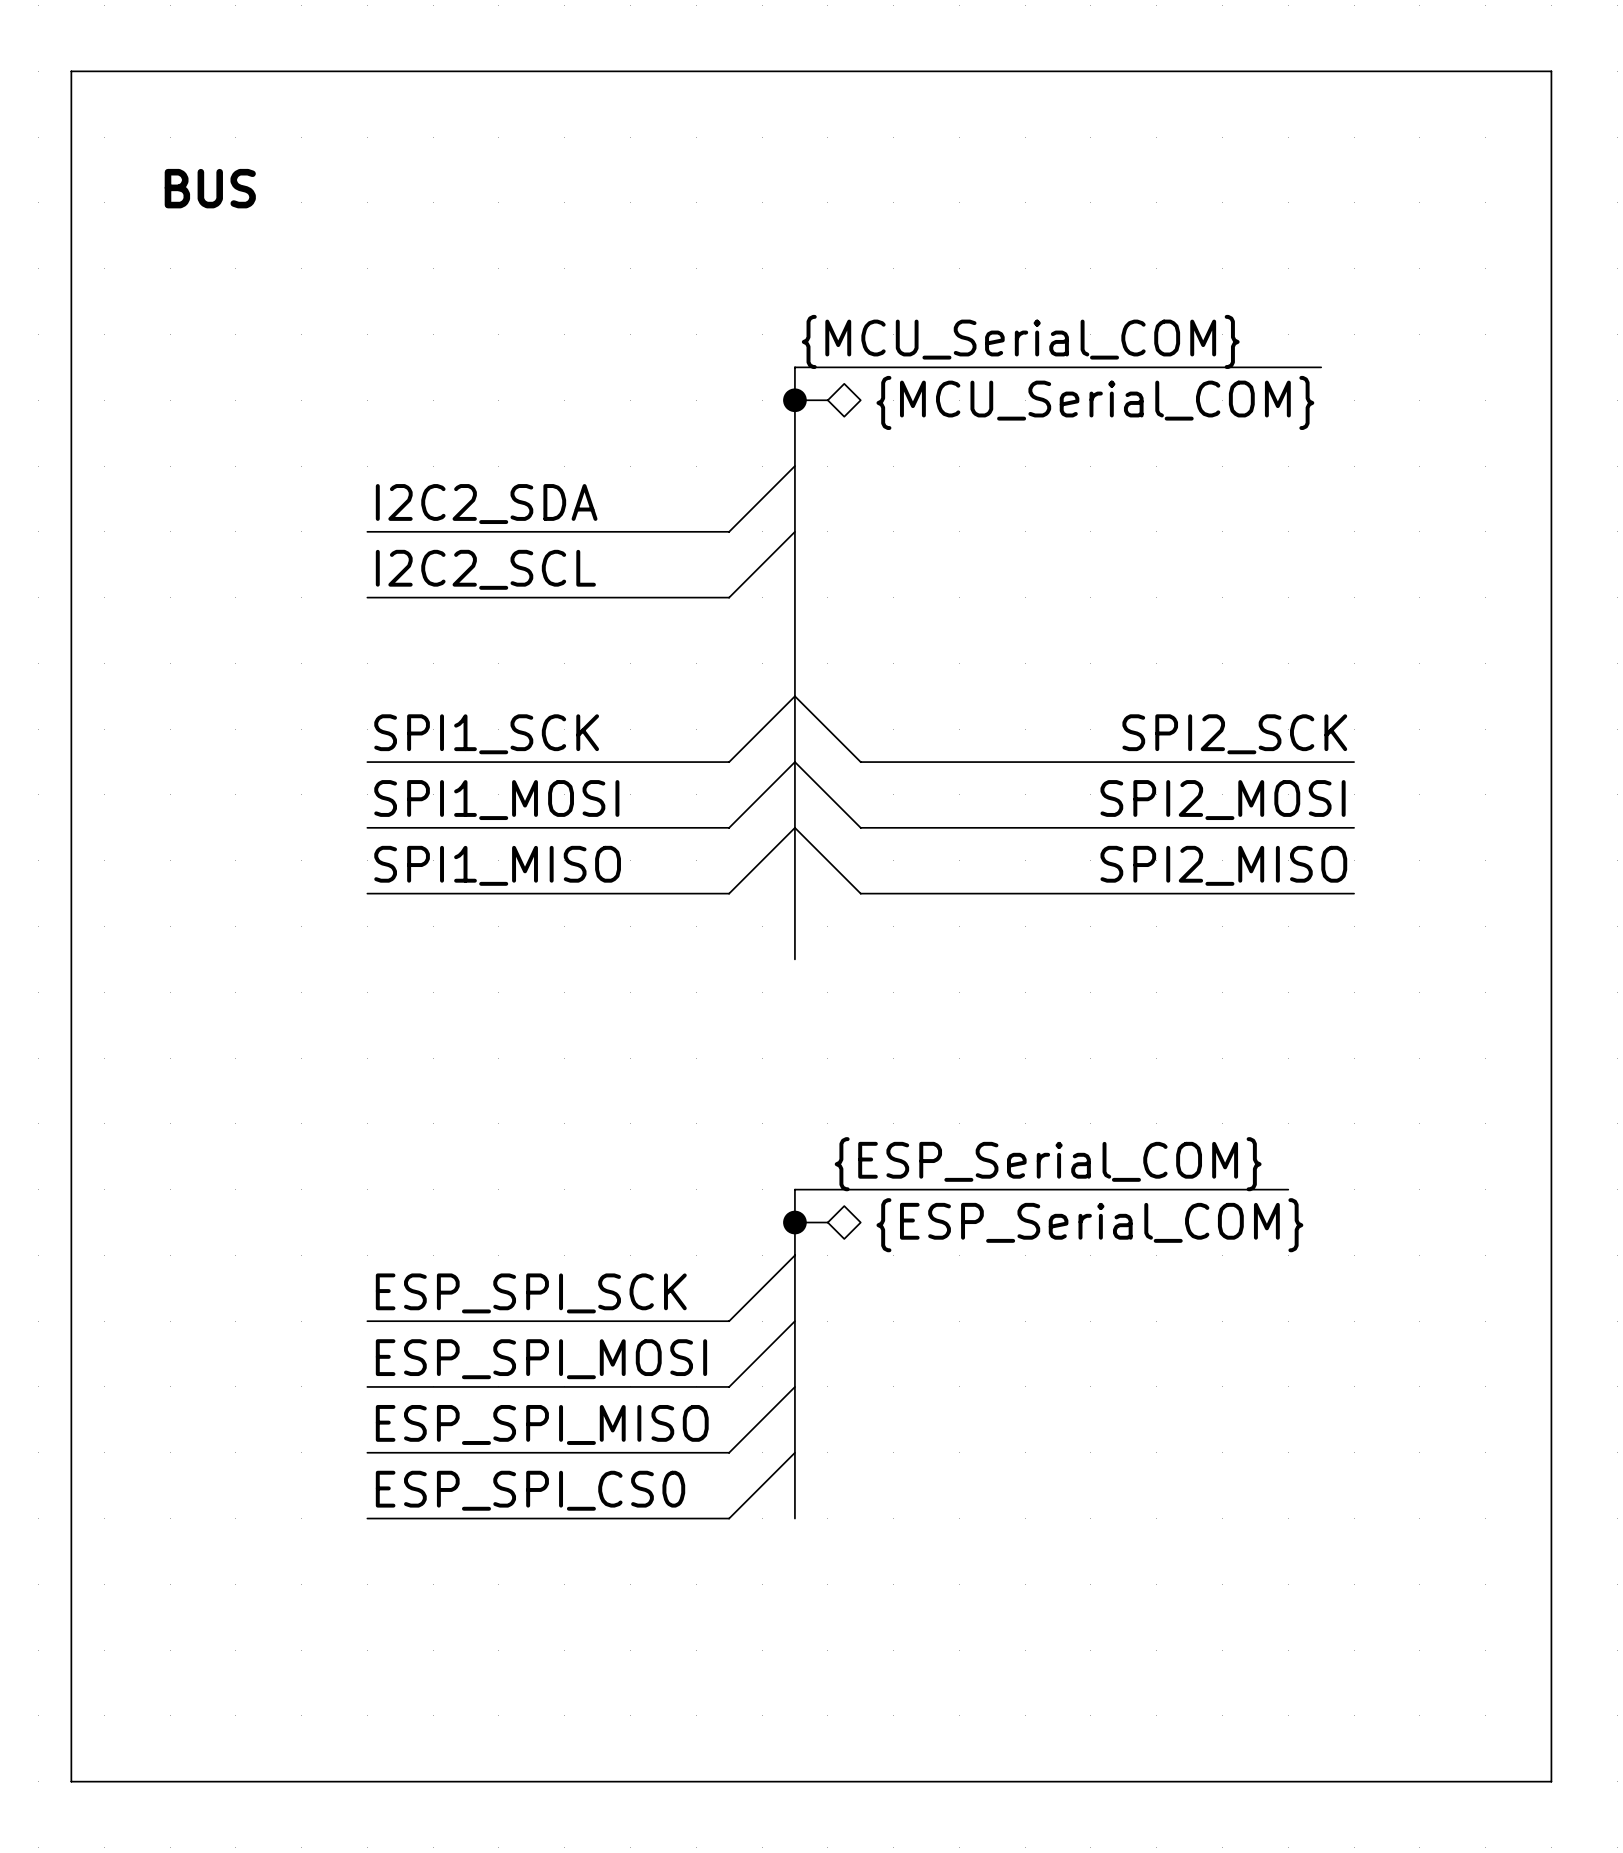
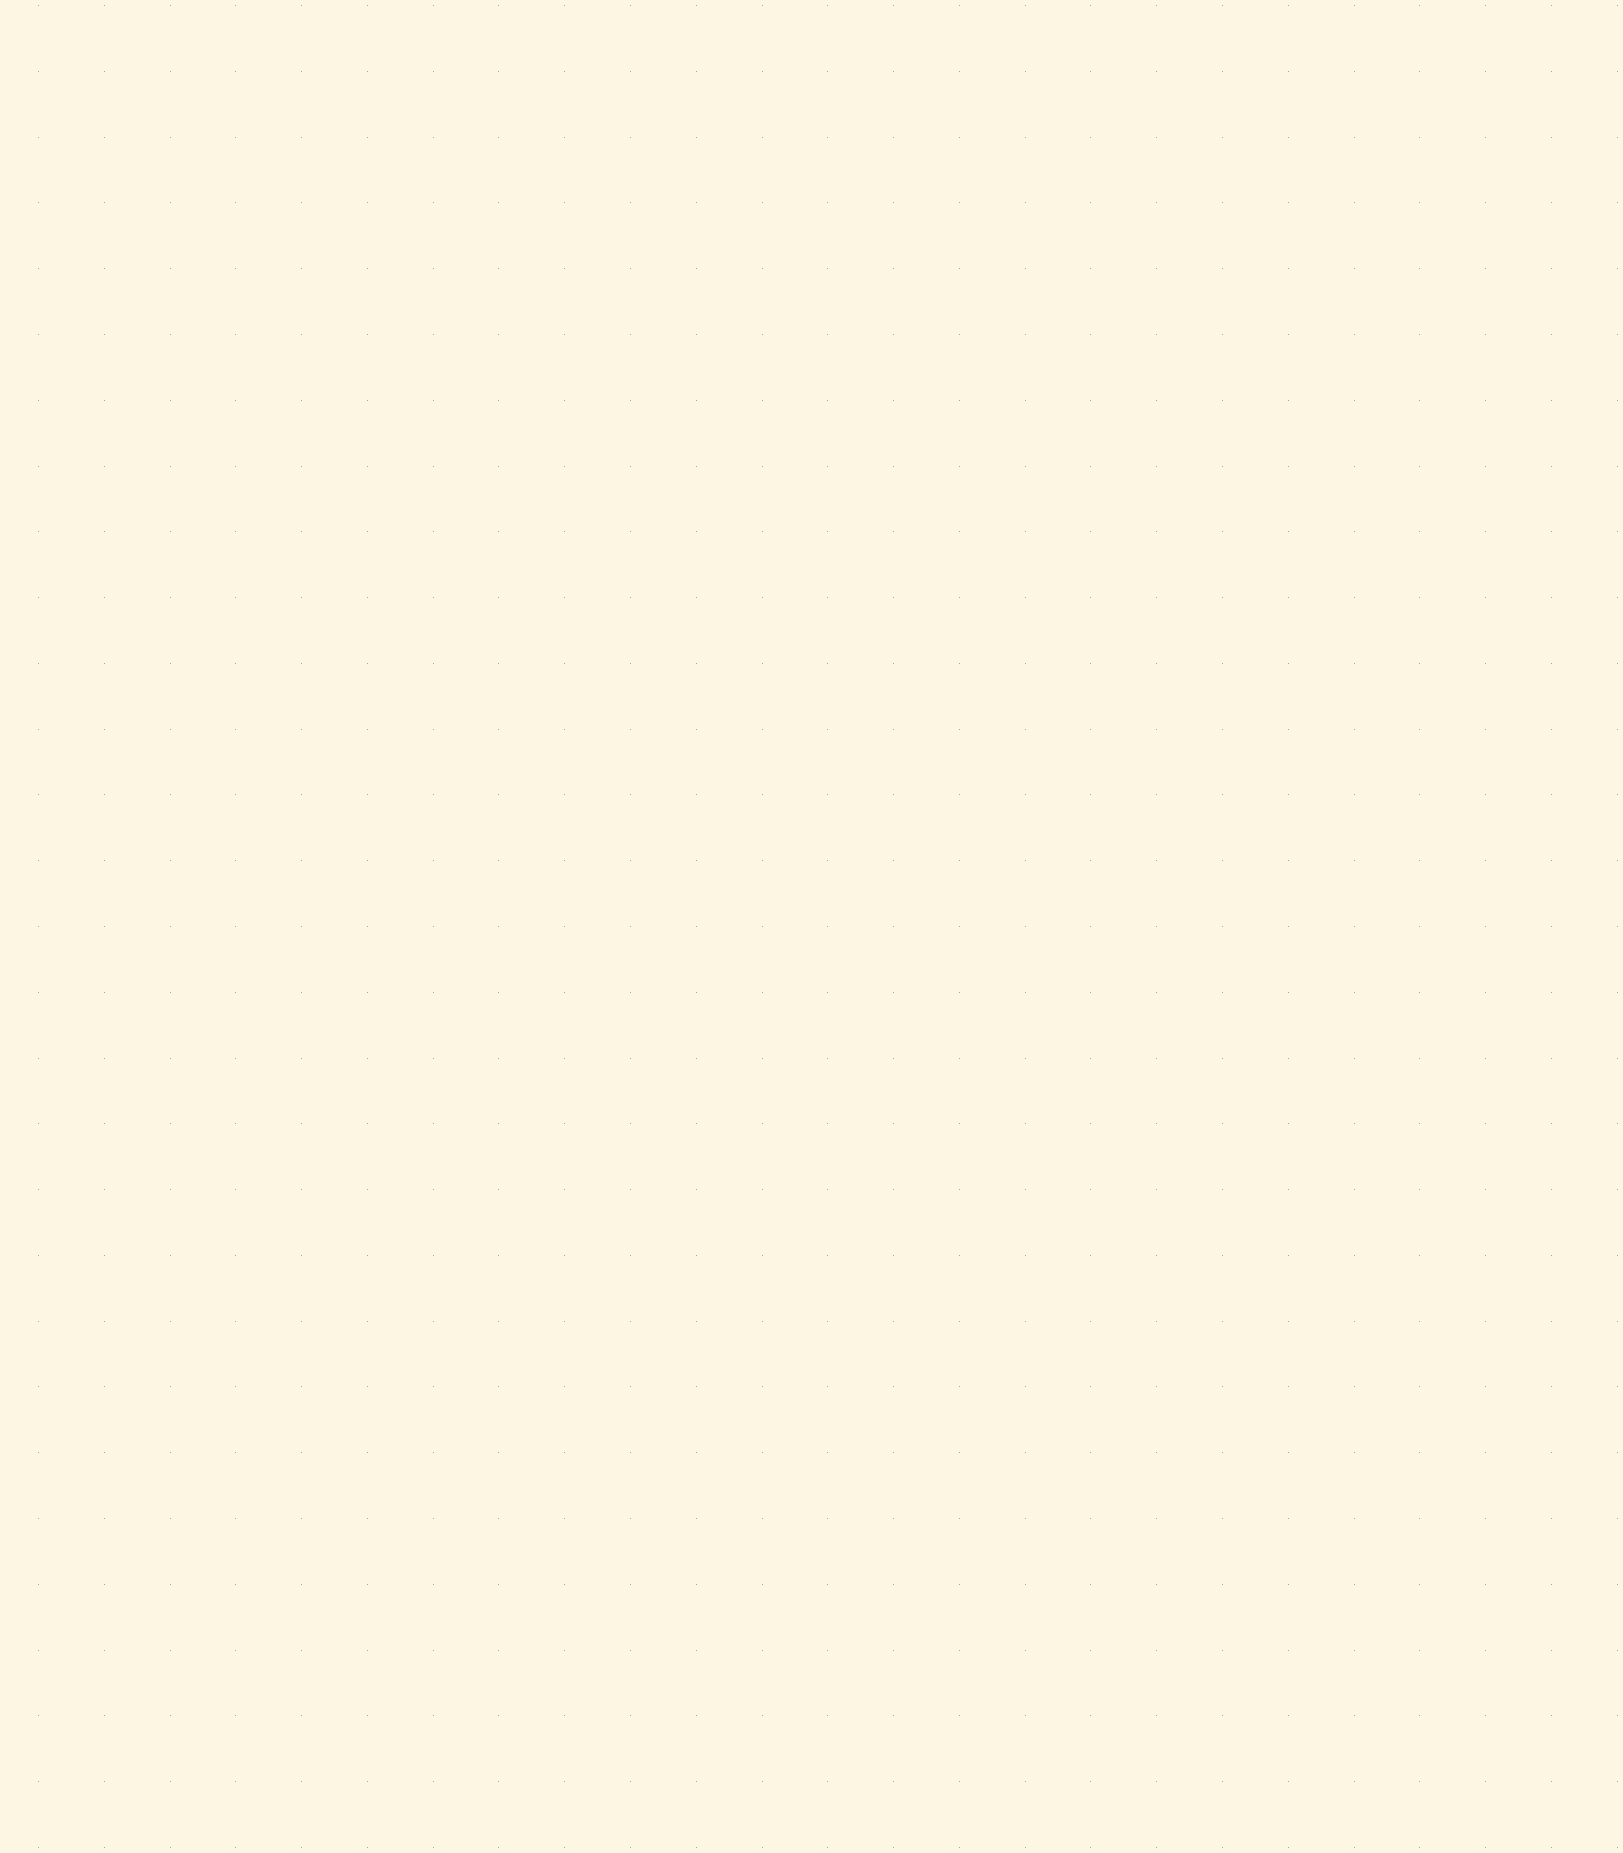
line: (71, 71) (1551, 71) (1551, 1781) (71, 1781) (71, 71) -> none
text: BUS (210, 188) -> none
label: {MCU_Serial_COM} (1020, 341) -> none
bus: (1321, 367) (794, 367) (794, 959) -> none
bus: (794, 400) (827, 400) -> none
junction: (794, 400) -> none
hierarchical label: {MCU_Serial_COM} (1095, 402) -> none
wire: (794, 466) (729, 531) (367, 531) -> none
label: I2C2_SDA (486, 504) -> none
wire: (794, 531) (729, 597) (367, 597) -> none
label: I2C2_SCL (485, 569) -> none
label: SPI1_SCK (486, 734) -> none
label: SPI2_SCK (1234, 734) -> none
wire: (367, 762) (729, 762) (794, 696) (860, 762) (1354, 762) -> none
label: SPI1_MOSI (496, 800) -> none
label: SPI2_MOSI (1223, 800) -> none
wire: (367, 827) (729, 827) (794, 762) (860, 827) (1354, 827) -> none
label: SPI1_MISO (497, 865) -> none
label: SPI2_MISO (1223, 865) -> none
wire: (367, 893) (729, 893) (794, 827) (860, 893) (1354, 893) -> none
label: {ESP_Serial_COM} (1048, 1164) -> none
bus: (1288, 1189) (794, 1189) (794, 1518) -> none
bus: (794, 1222) (827, 1222) -> none
junction: (794, 1222) -> none
hierarchical label: {ESP_Serial_COM} (1089, 1225) -> none
wire: (794, 1255) (729, 1321) (367, 1321) -> none
label: ESP_SPI_SCK (531, 1293) -> none
wire: (794, 1321) (729, 1386) (367, 1386) -> none
label: ESP_SPI_MOSI (541, 1359) -> none
wire: (794, 1386) (729, 1452) (367, 1452) -> none
label: ESP_SPI_MISO (542, 1424) -> none
wire: (794, 1452) (729, 1518) (367, 1518) -> none
label: ESP_SPI_CS0 (530, 1490) -> none

